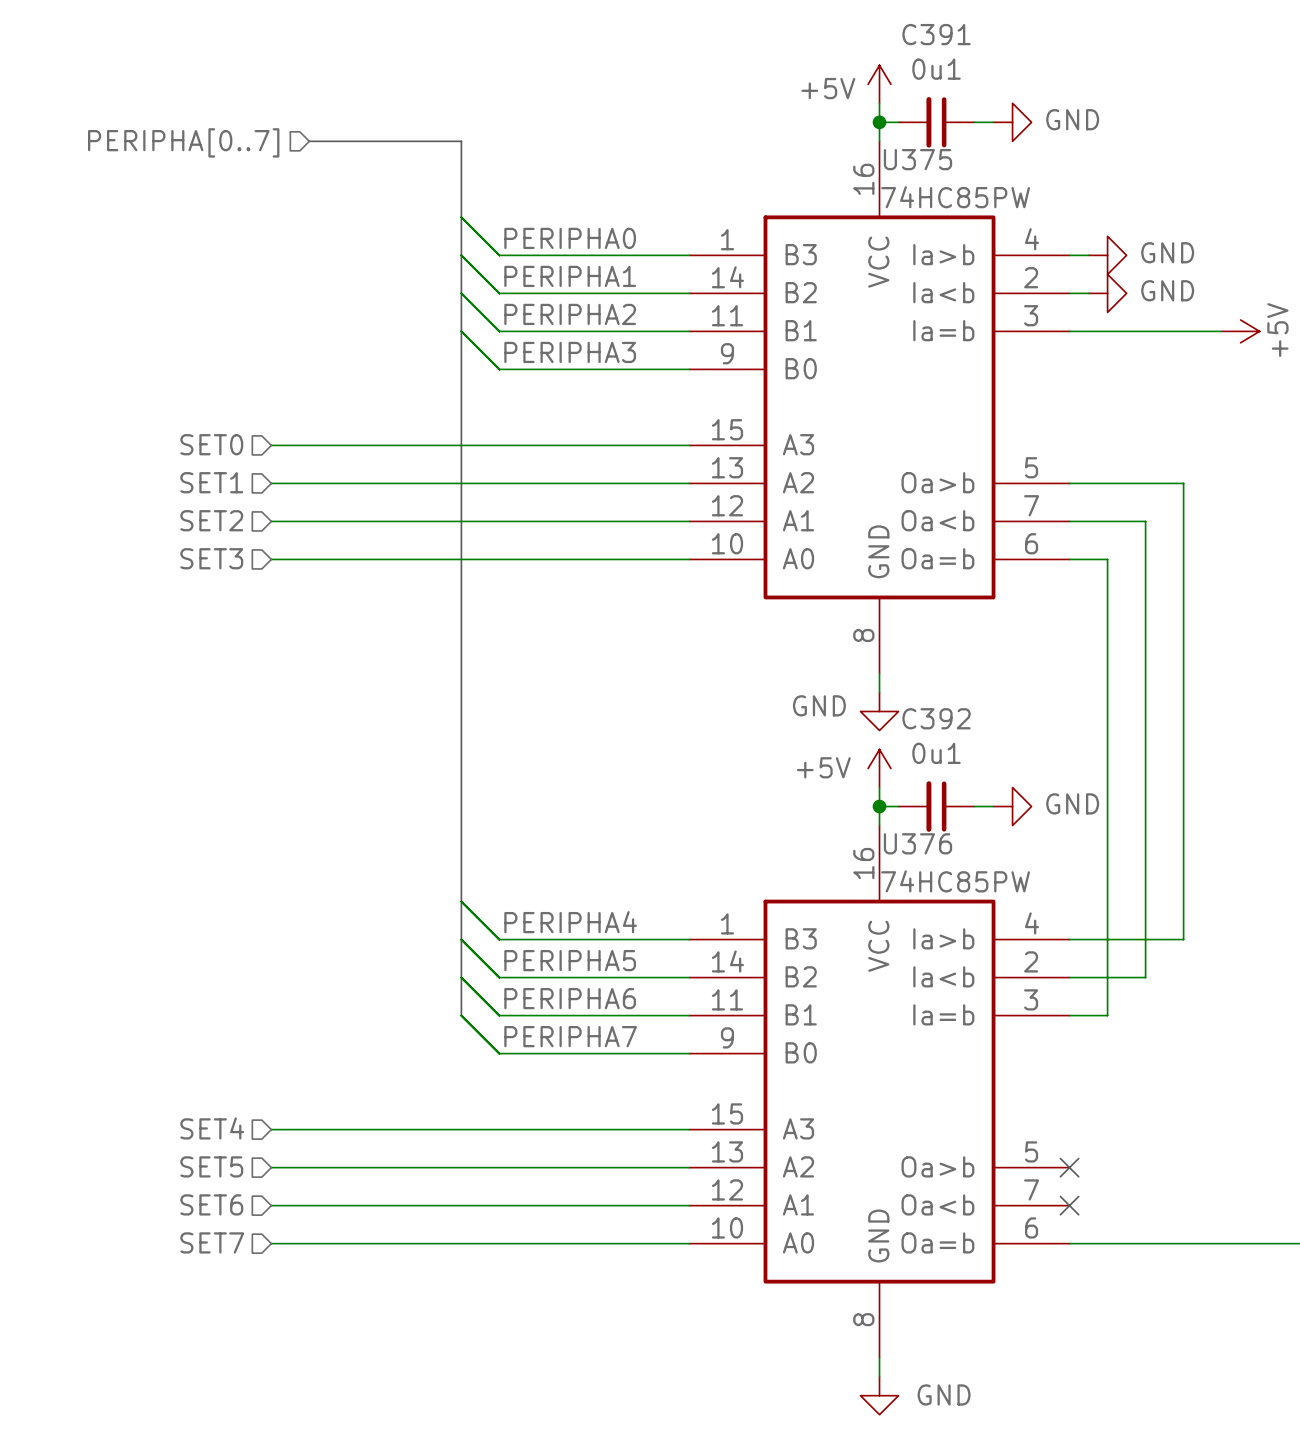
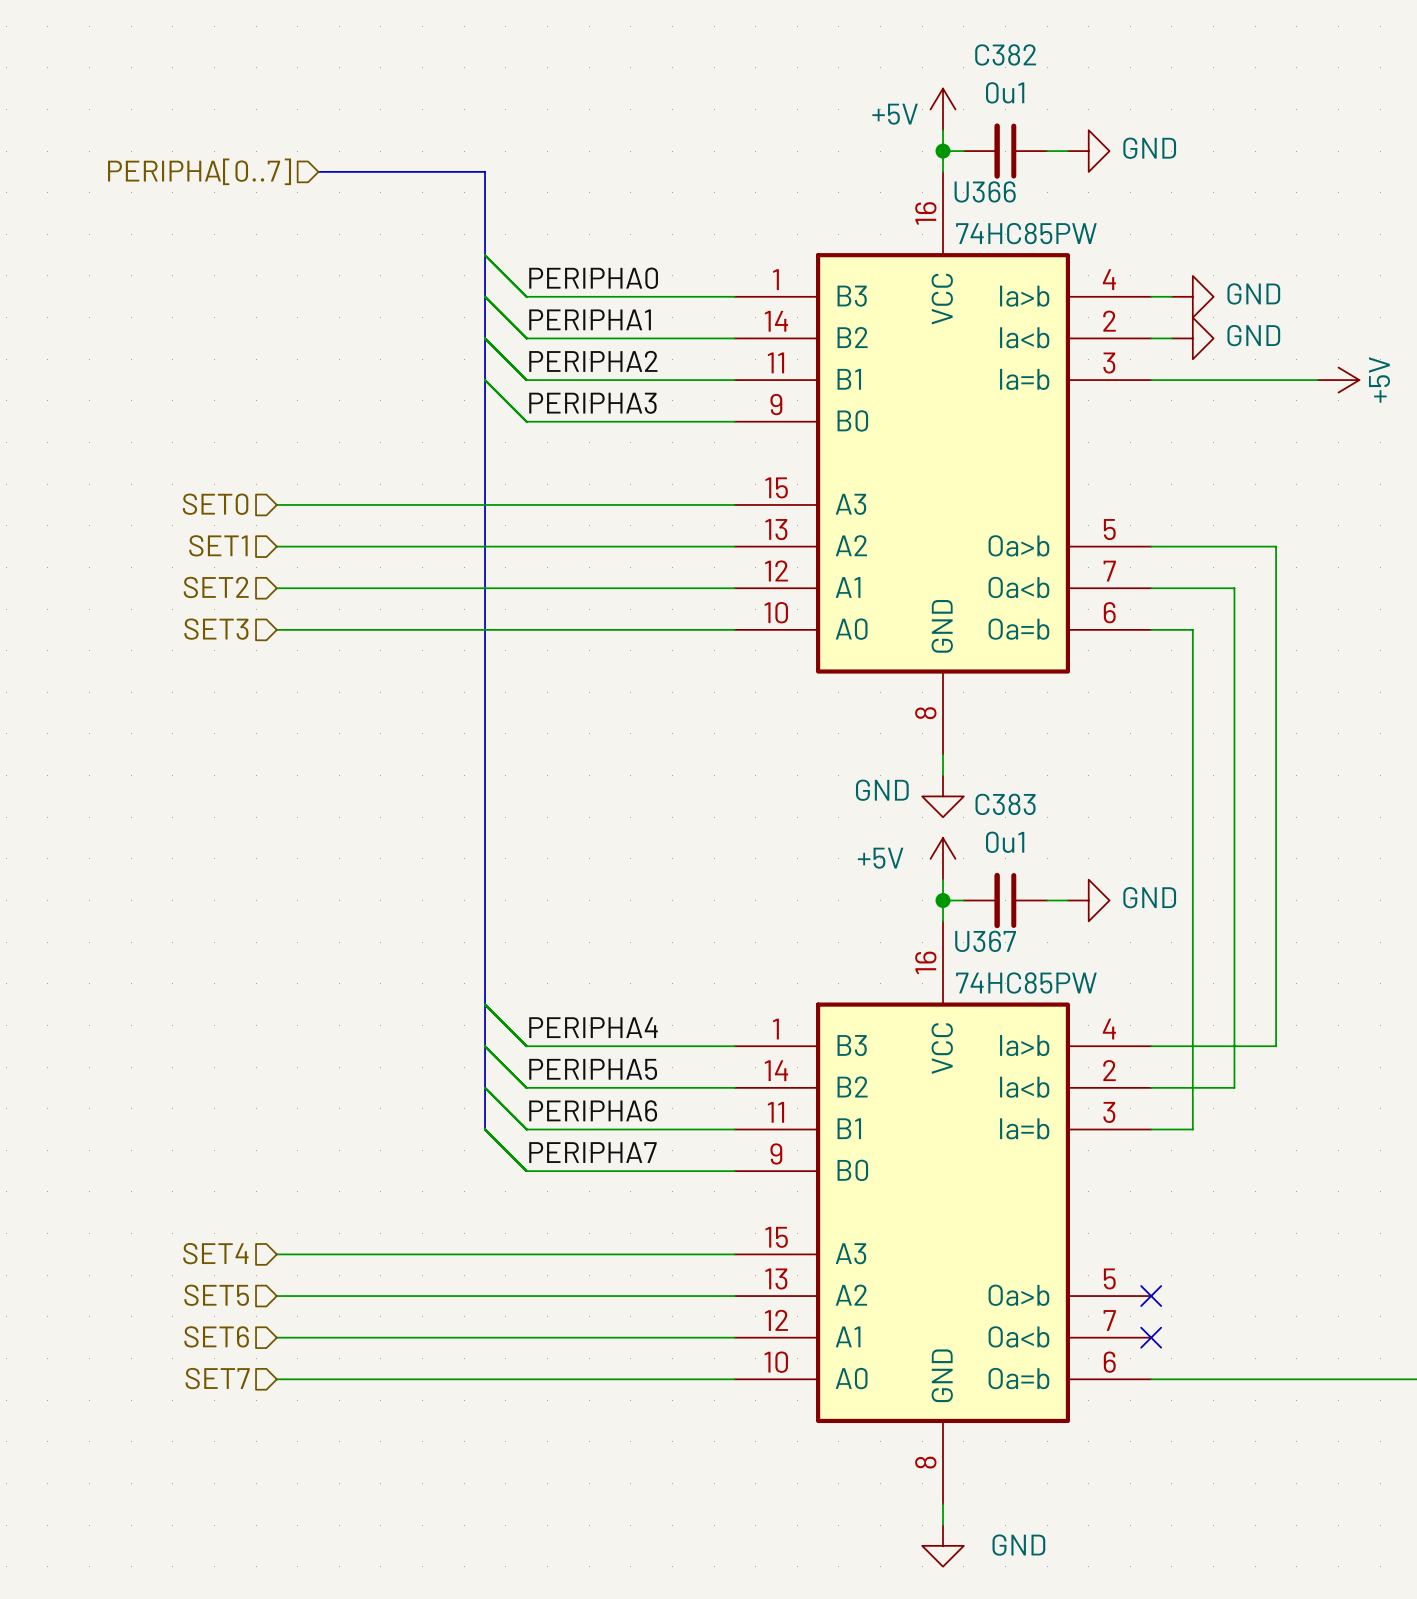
C391 name: C391 (936, 34) -> C382 (1005, 54)
U375 name: U375 (917, 159) -> U366 (985, 191)
C392 name: C392 (936, 718) -> C383 (1005, 804)
U376 name: U376 (917, 843) -> U367 (985, 941)

